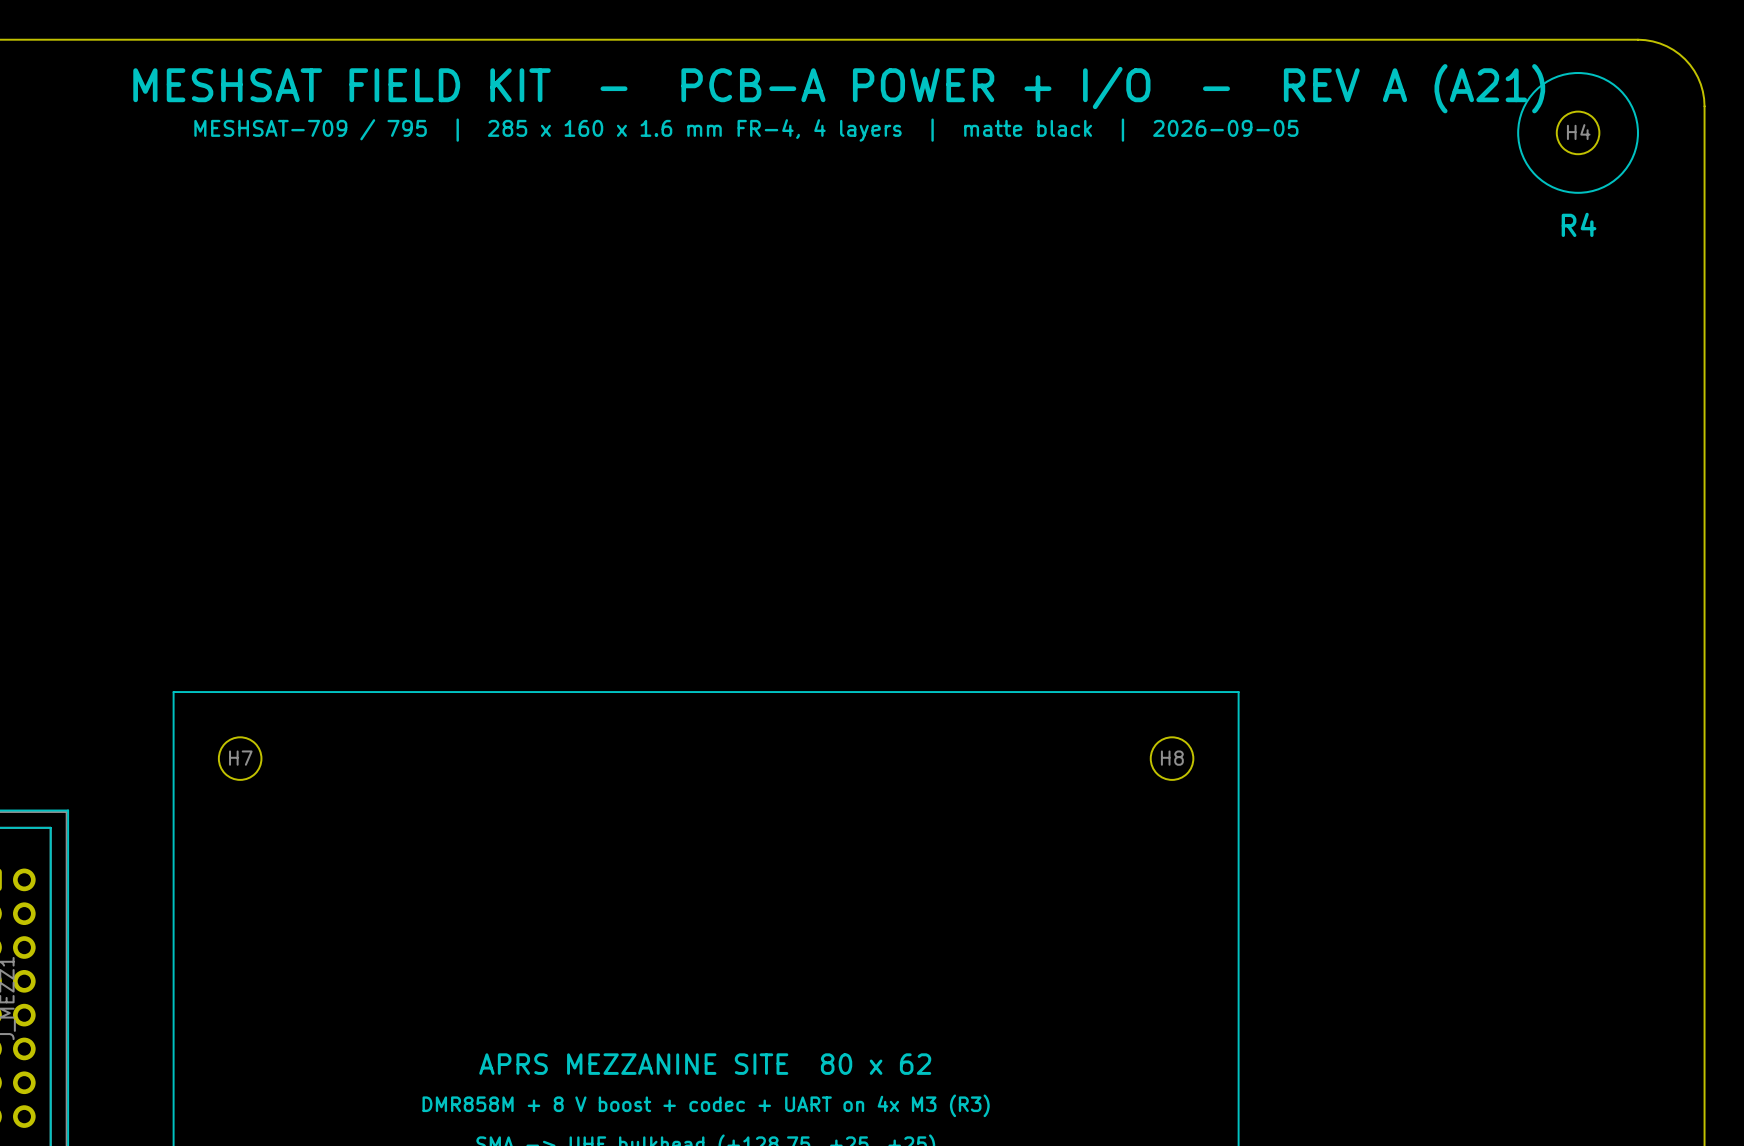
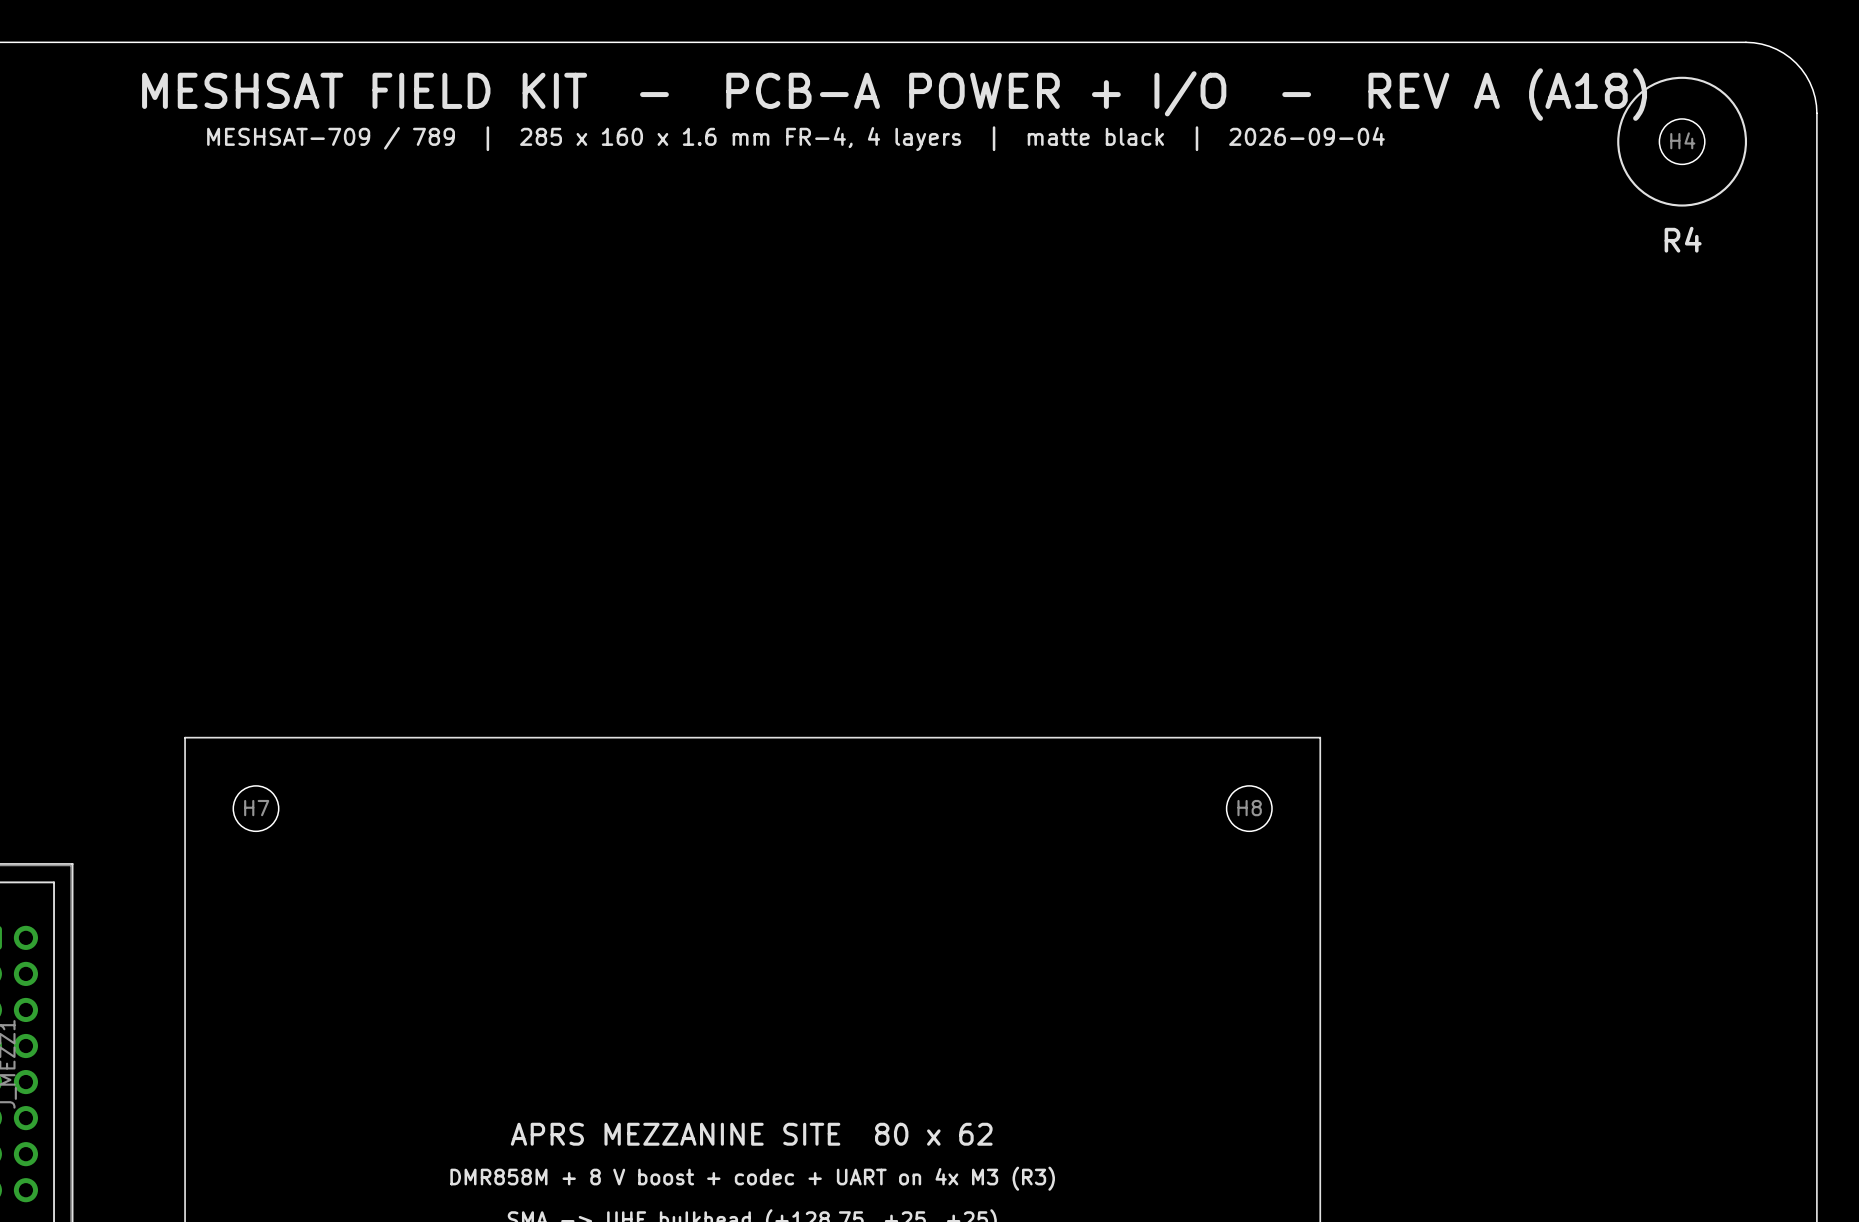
text: MESHSAT FIELD KIT - PCB-A POWER + I/O - REV A (A21) (839, 88) -> MESHSAT FIELD KIT - PCB-A POWER + I/O - REV A (A18) (894, 94)
text: MESHSAT-709 / 795 | 285 x 160 x 1.6 mm FR-4, 4 layers | matte black | 2026-09-05 (746, 130) -> MESHSAT-709 / 789 | 285 x 160 x 1.6 mm FR-4, 4 layers | matte black | 2026-09-04 (795, 138)

